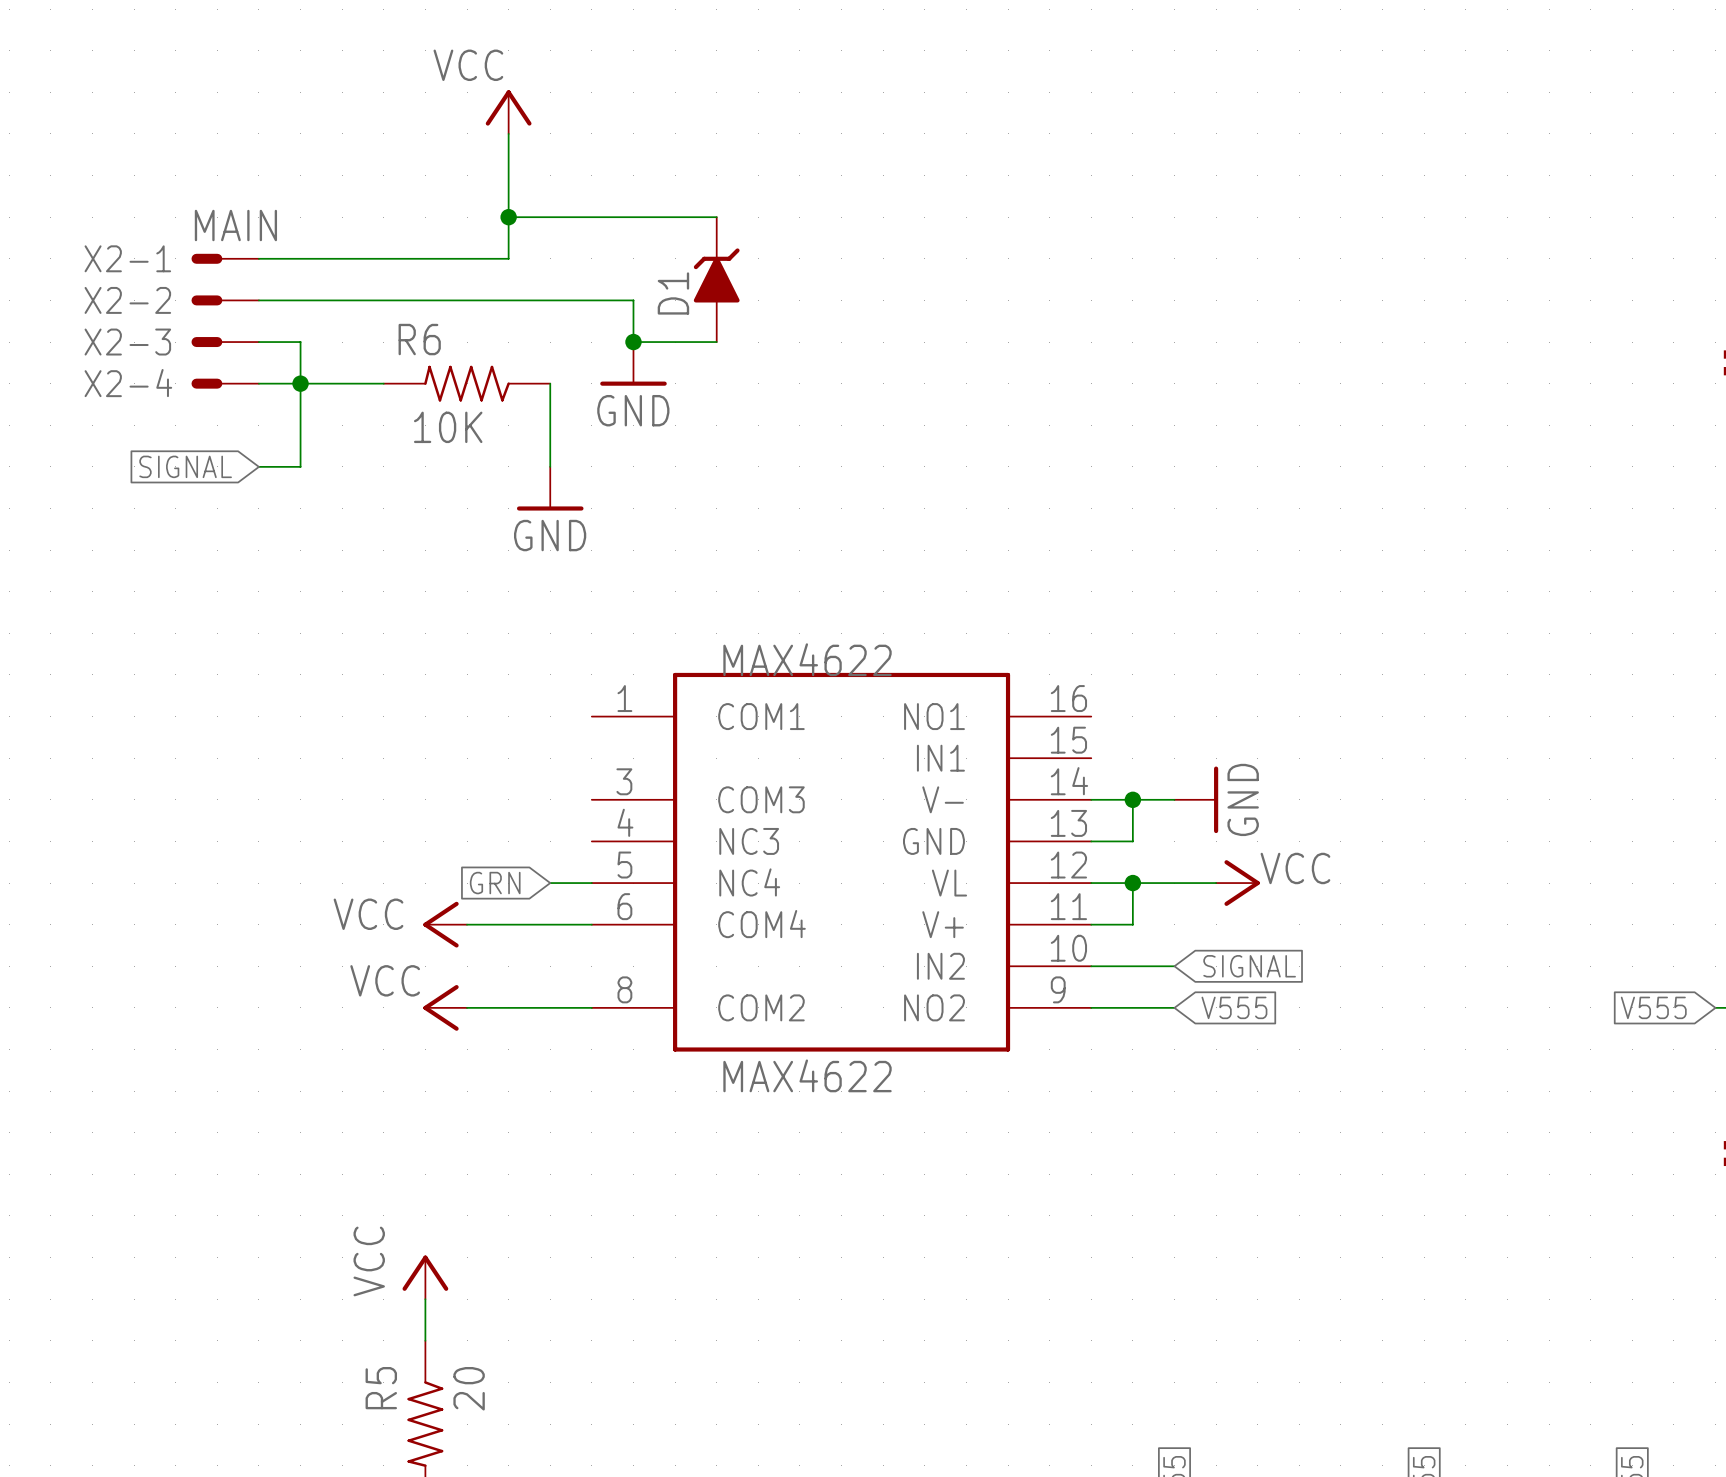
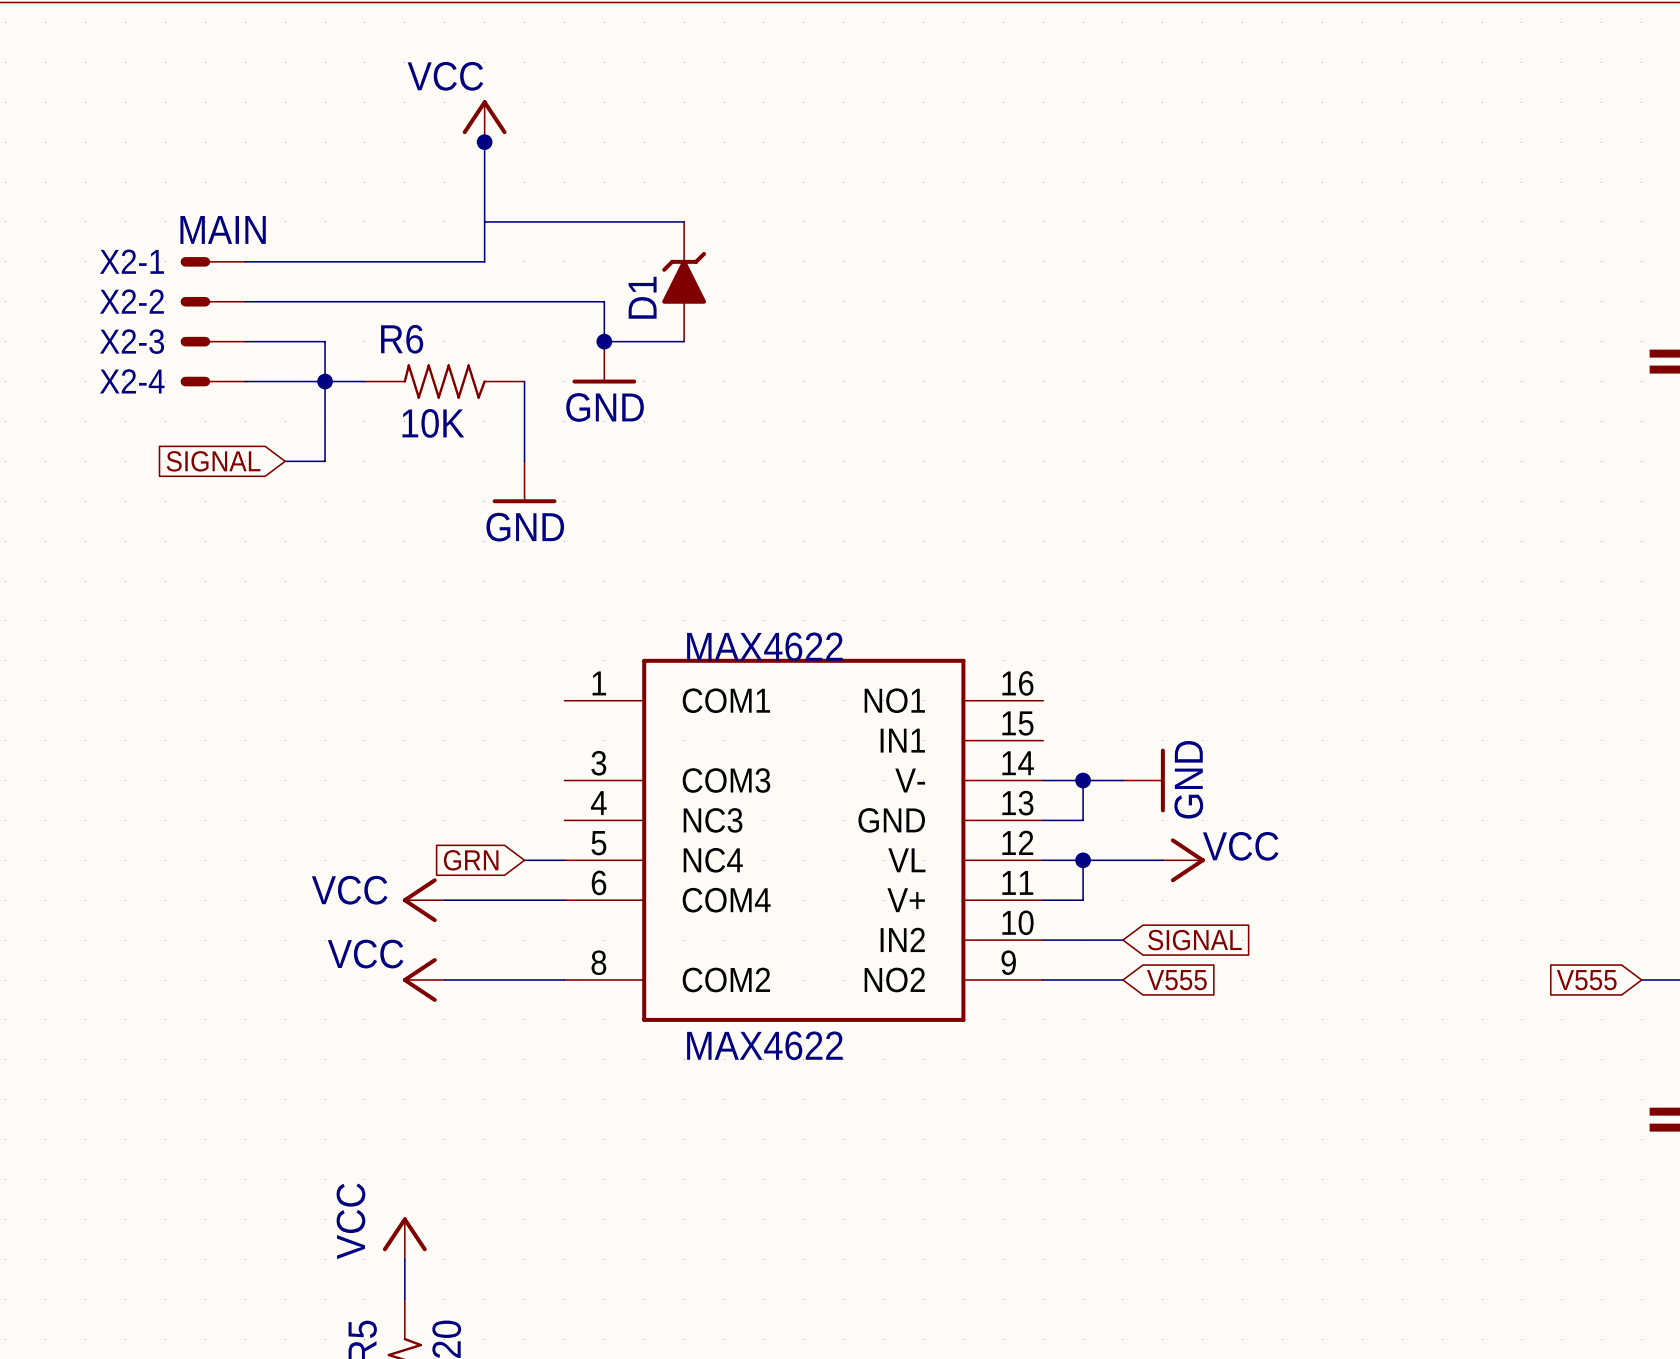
junction position: (508, 217) -> (484, 142)
wire: (300, 342) (300, 466) (258, 466) -> (285, 341) (325, 341) (325, 461) (285, 461)
junction position: (300, 383) -> (325, 381)
global label position: SIGNAL (185, 466) -> SIGNAL (213, 461)

